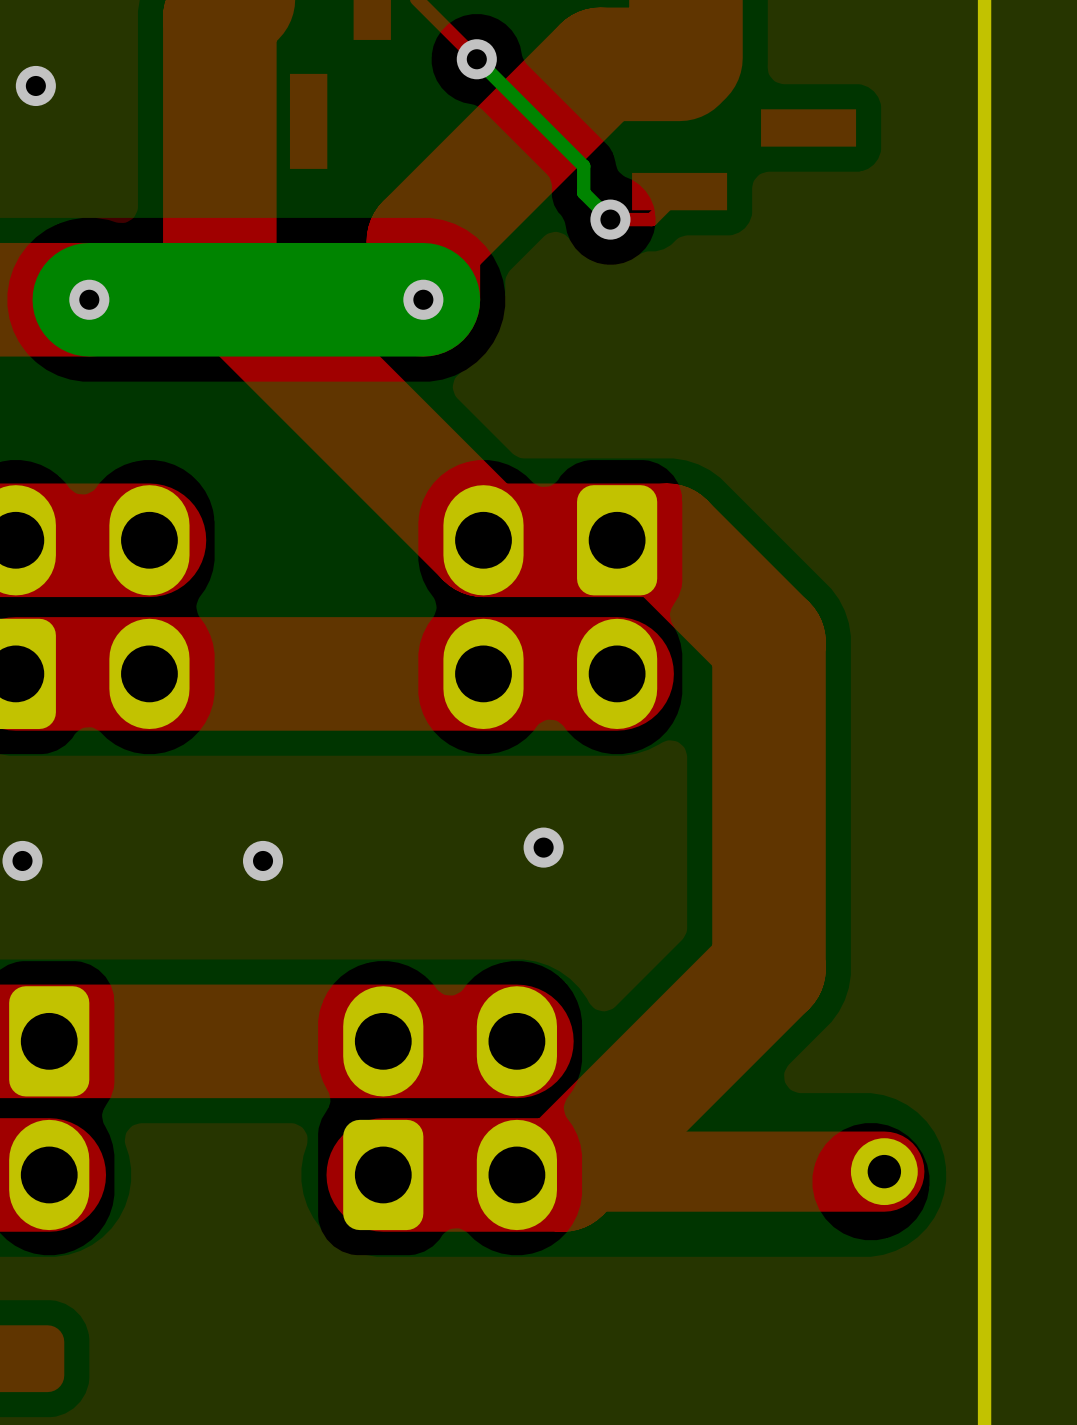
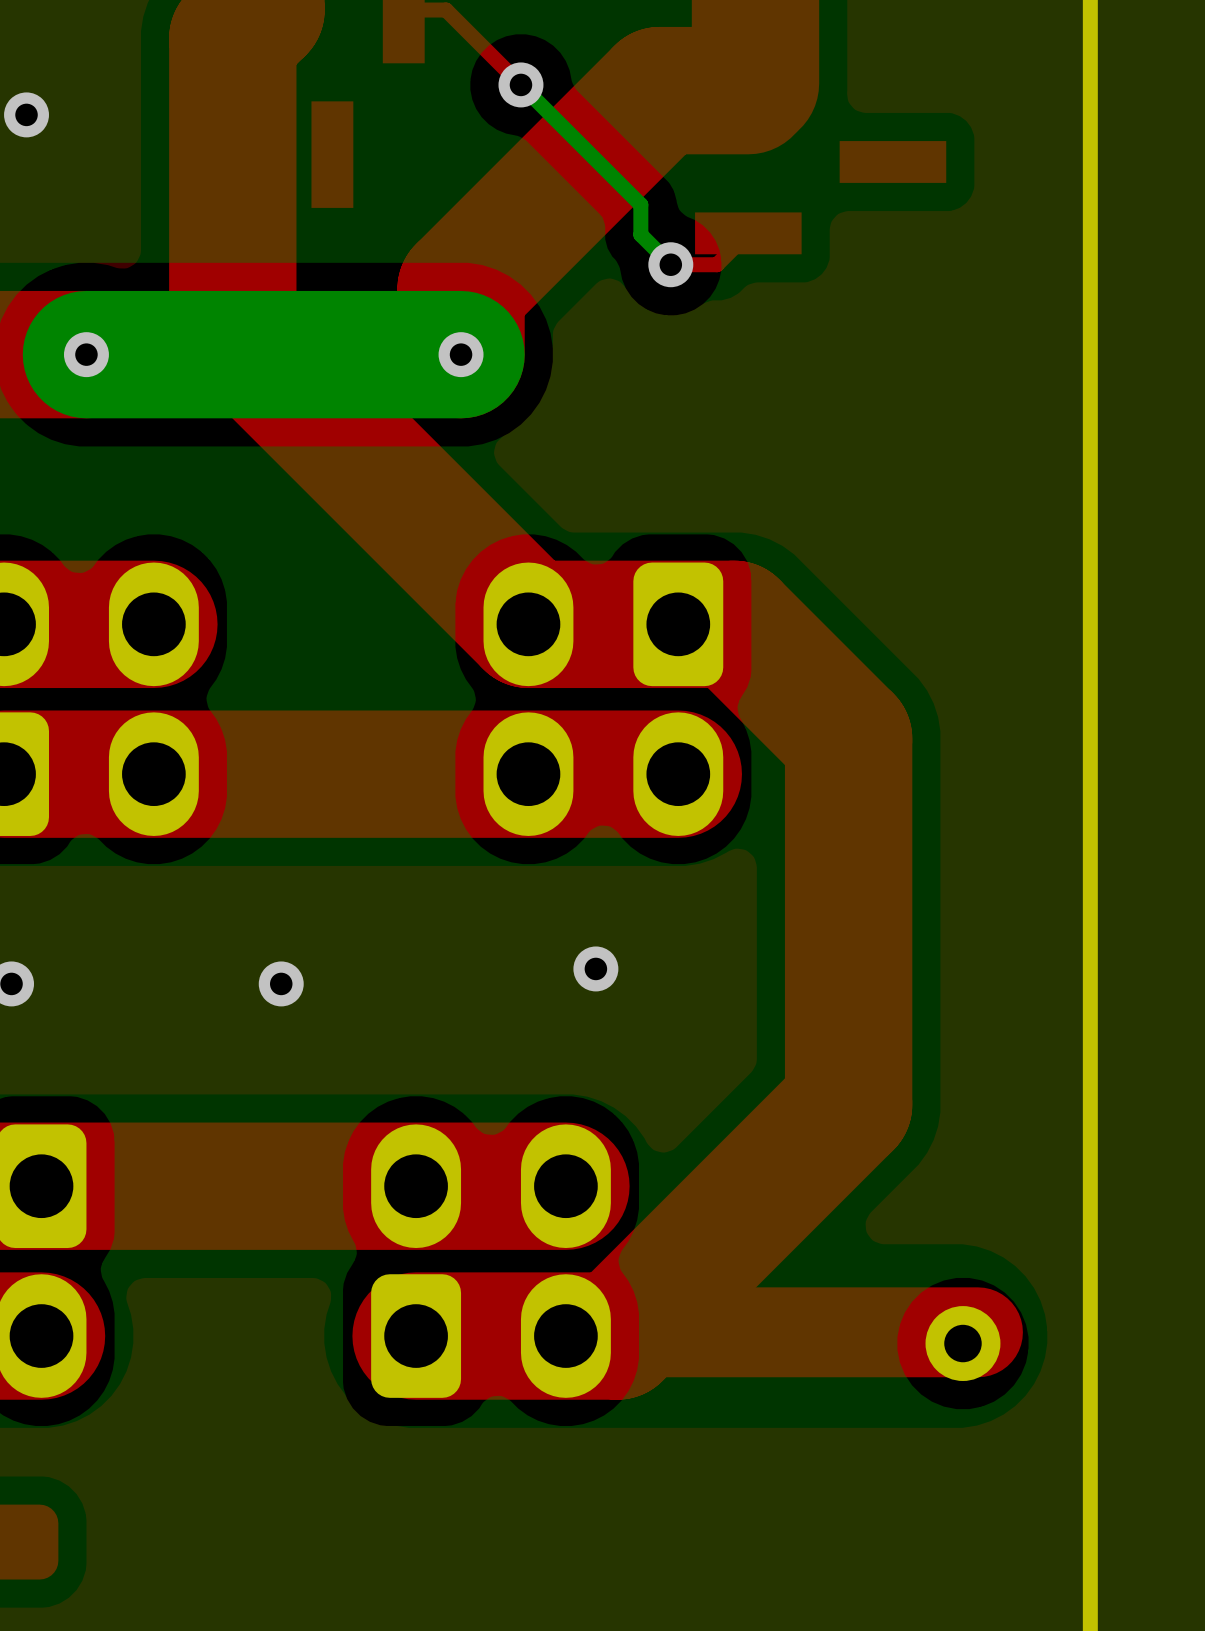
part position: (884, 1171) -> (962, 1343)

